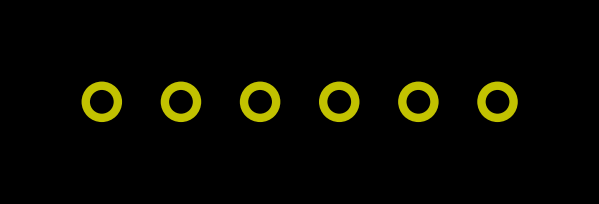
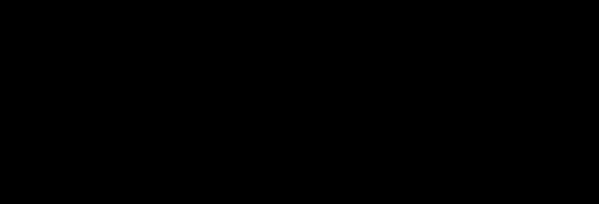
part: (299, 101) -> none

